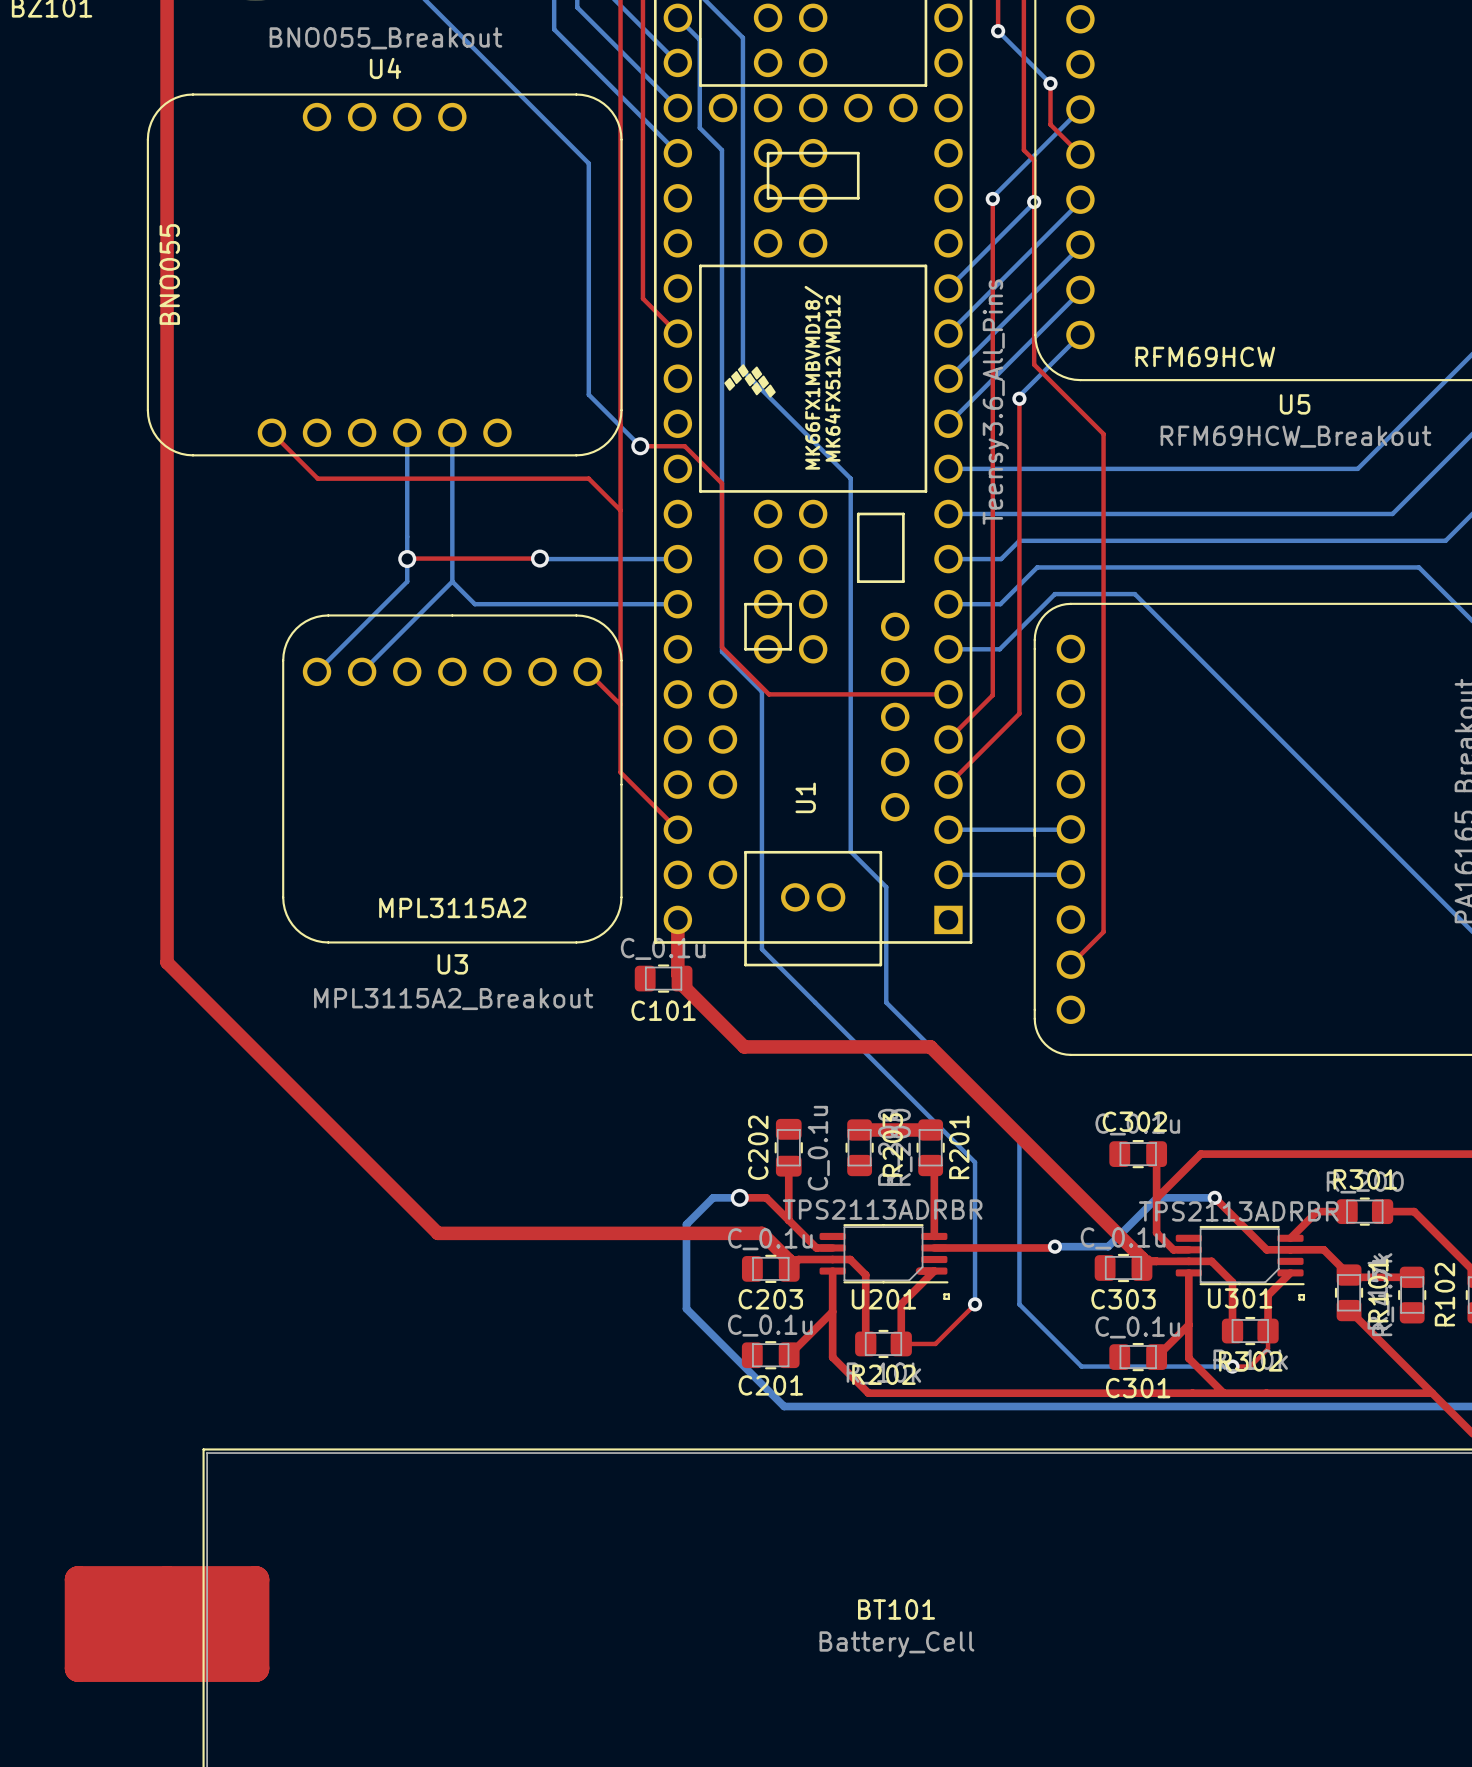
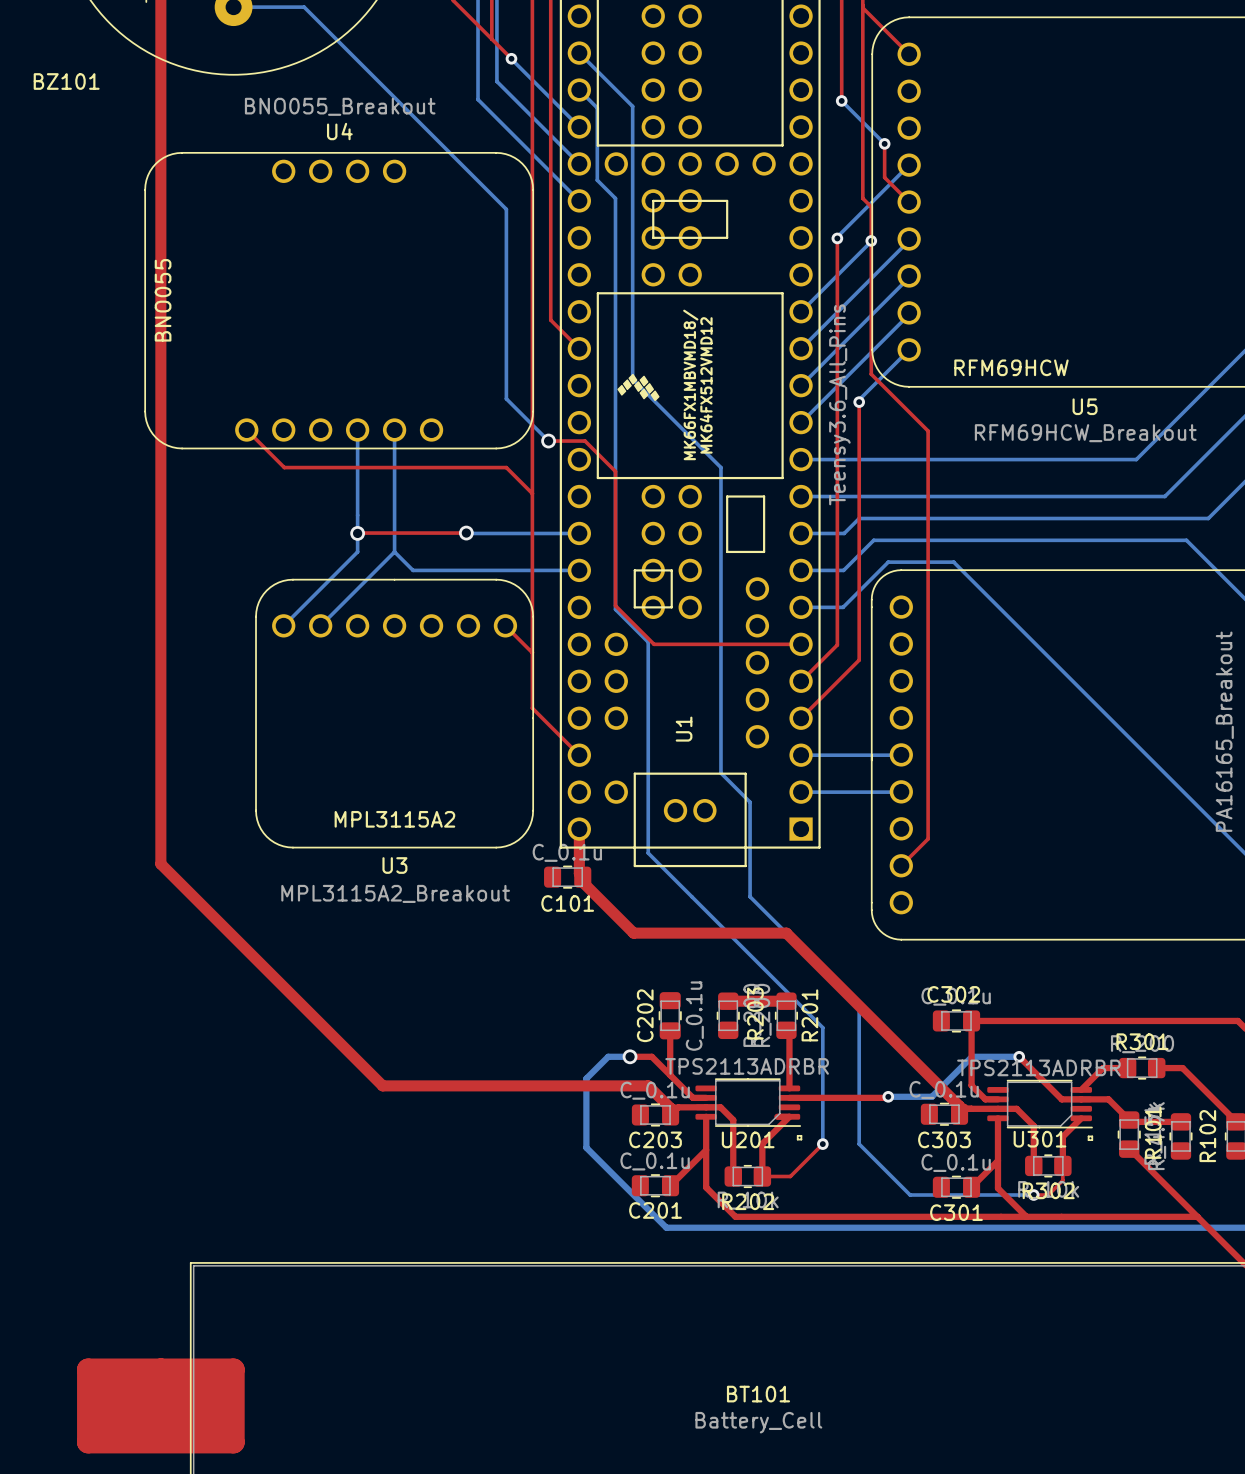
top track: (1200, 1154) (1156, 1198) -> (1007, 1020) (971, 1020)

